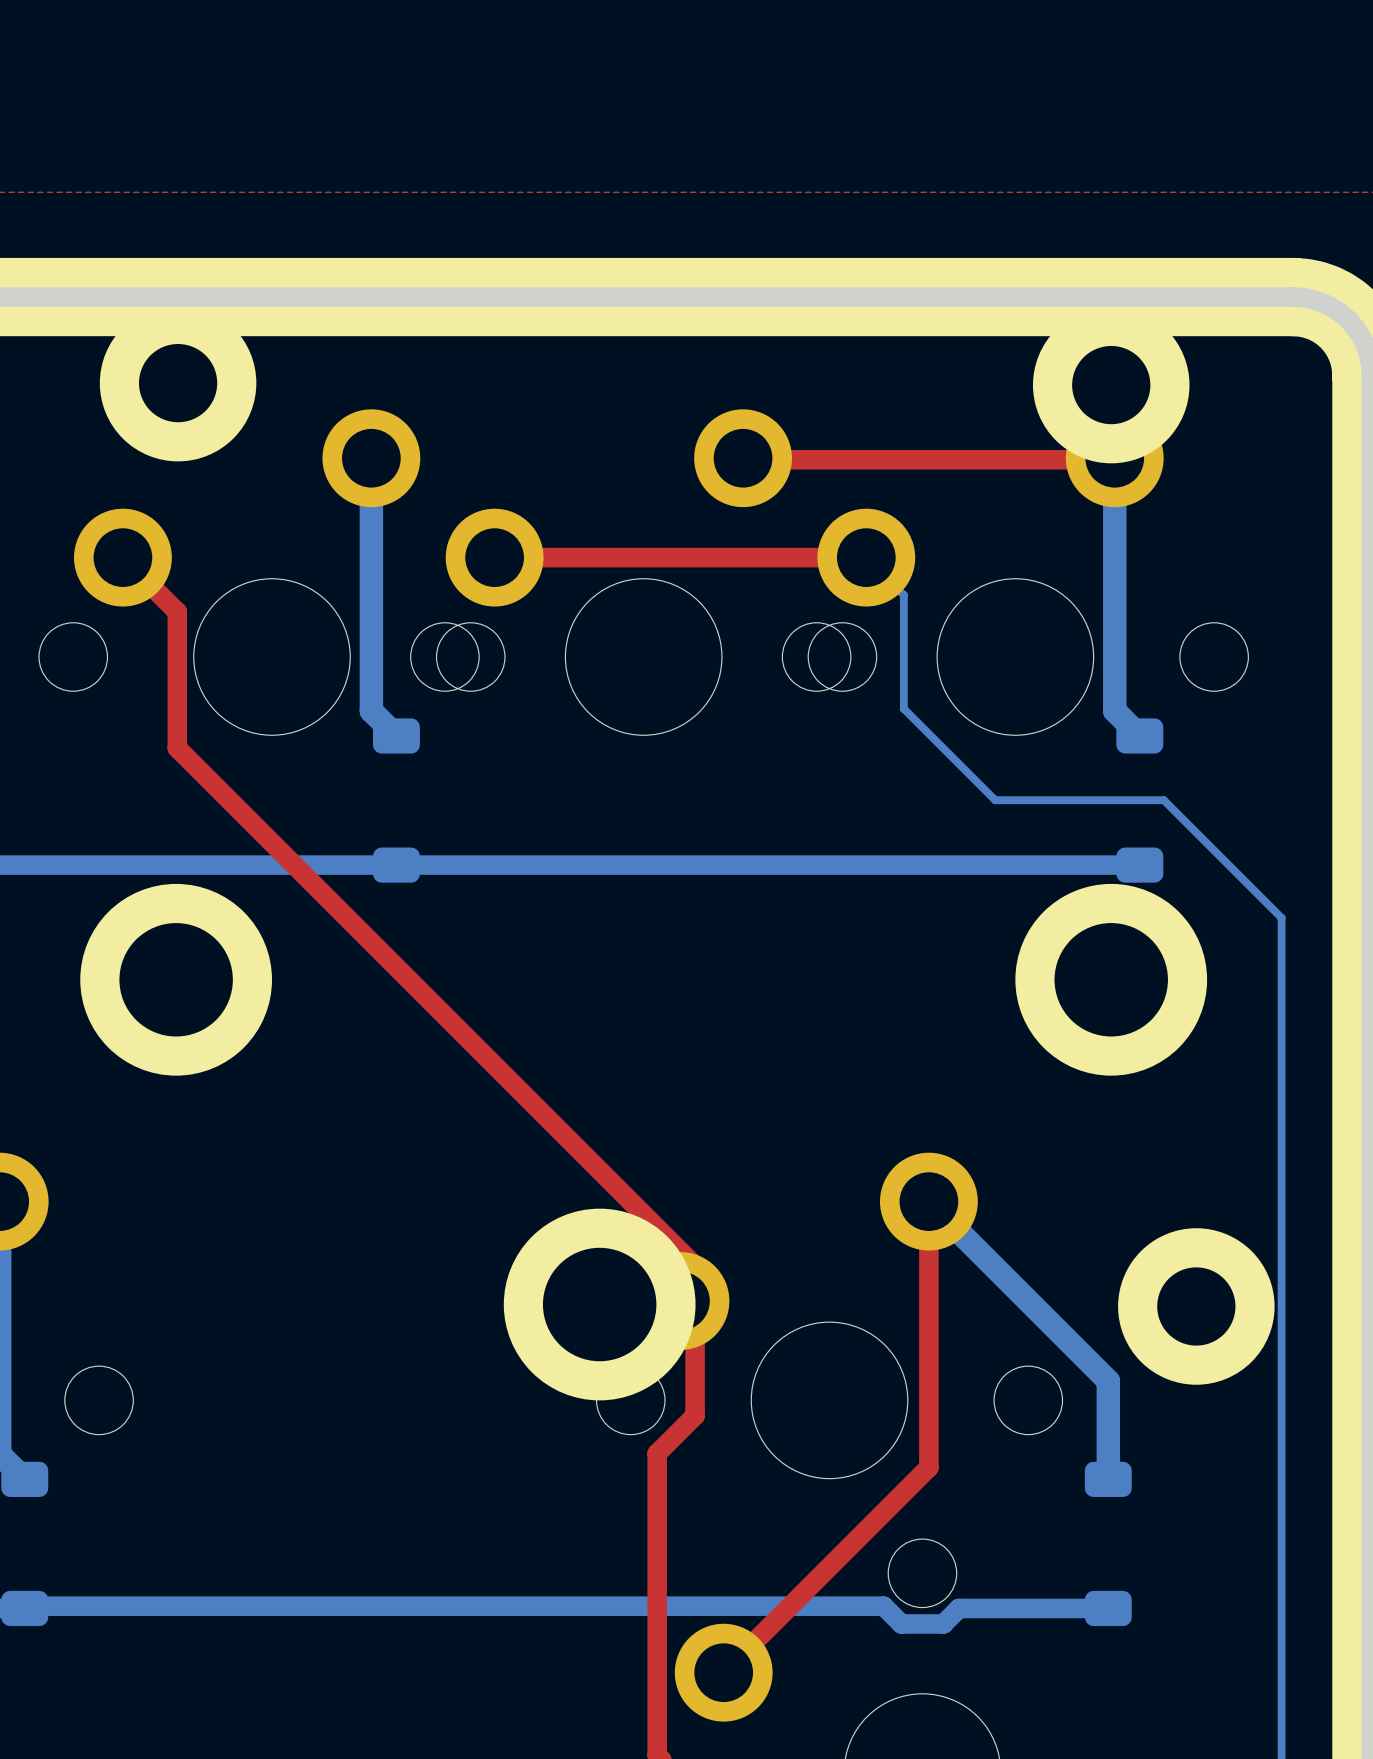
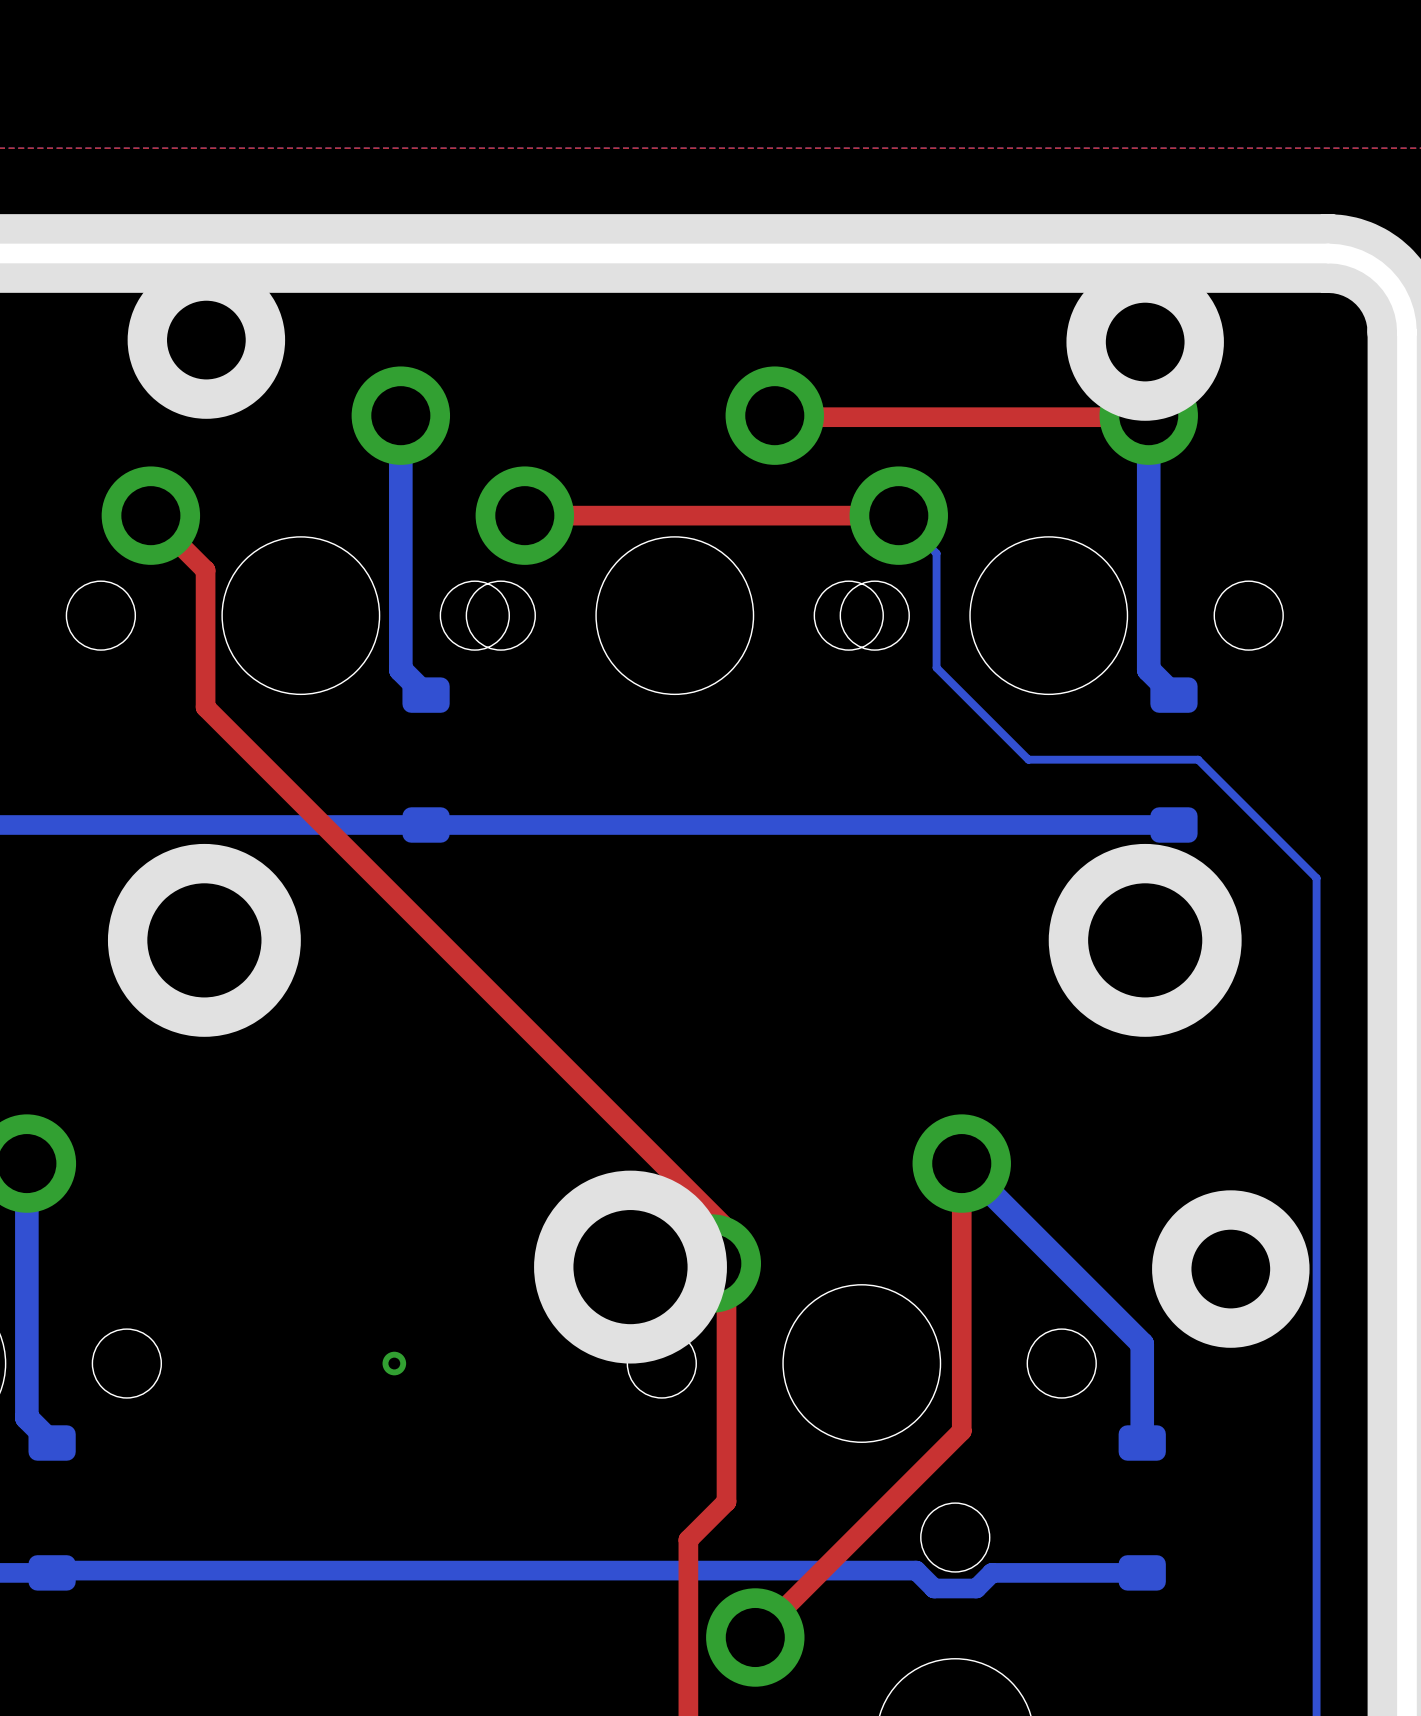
via: none -> (394, 1363)
top track: (695, 1415) (657, 1453) (657, 1575) -> (726, 1378) (726, 1501) (688, 1539)

